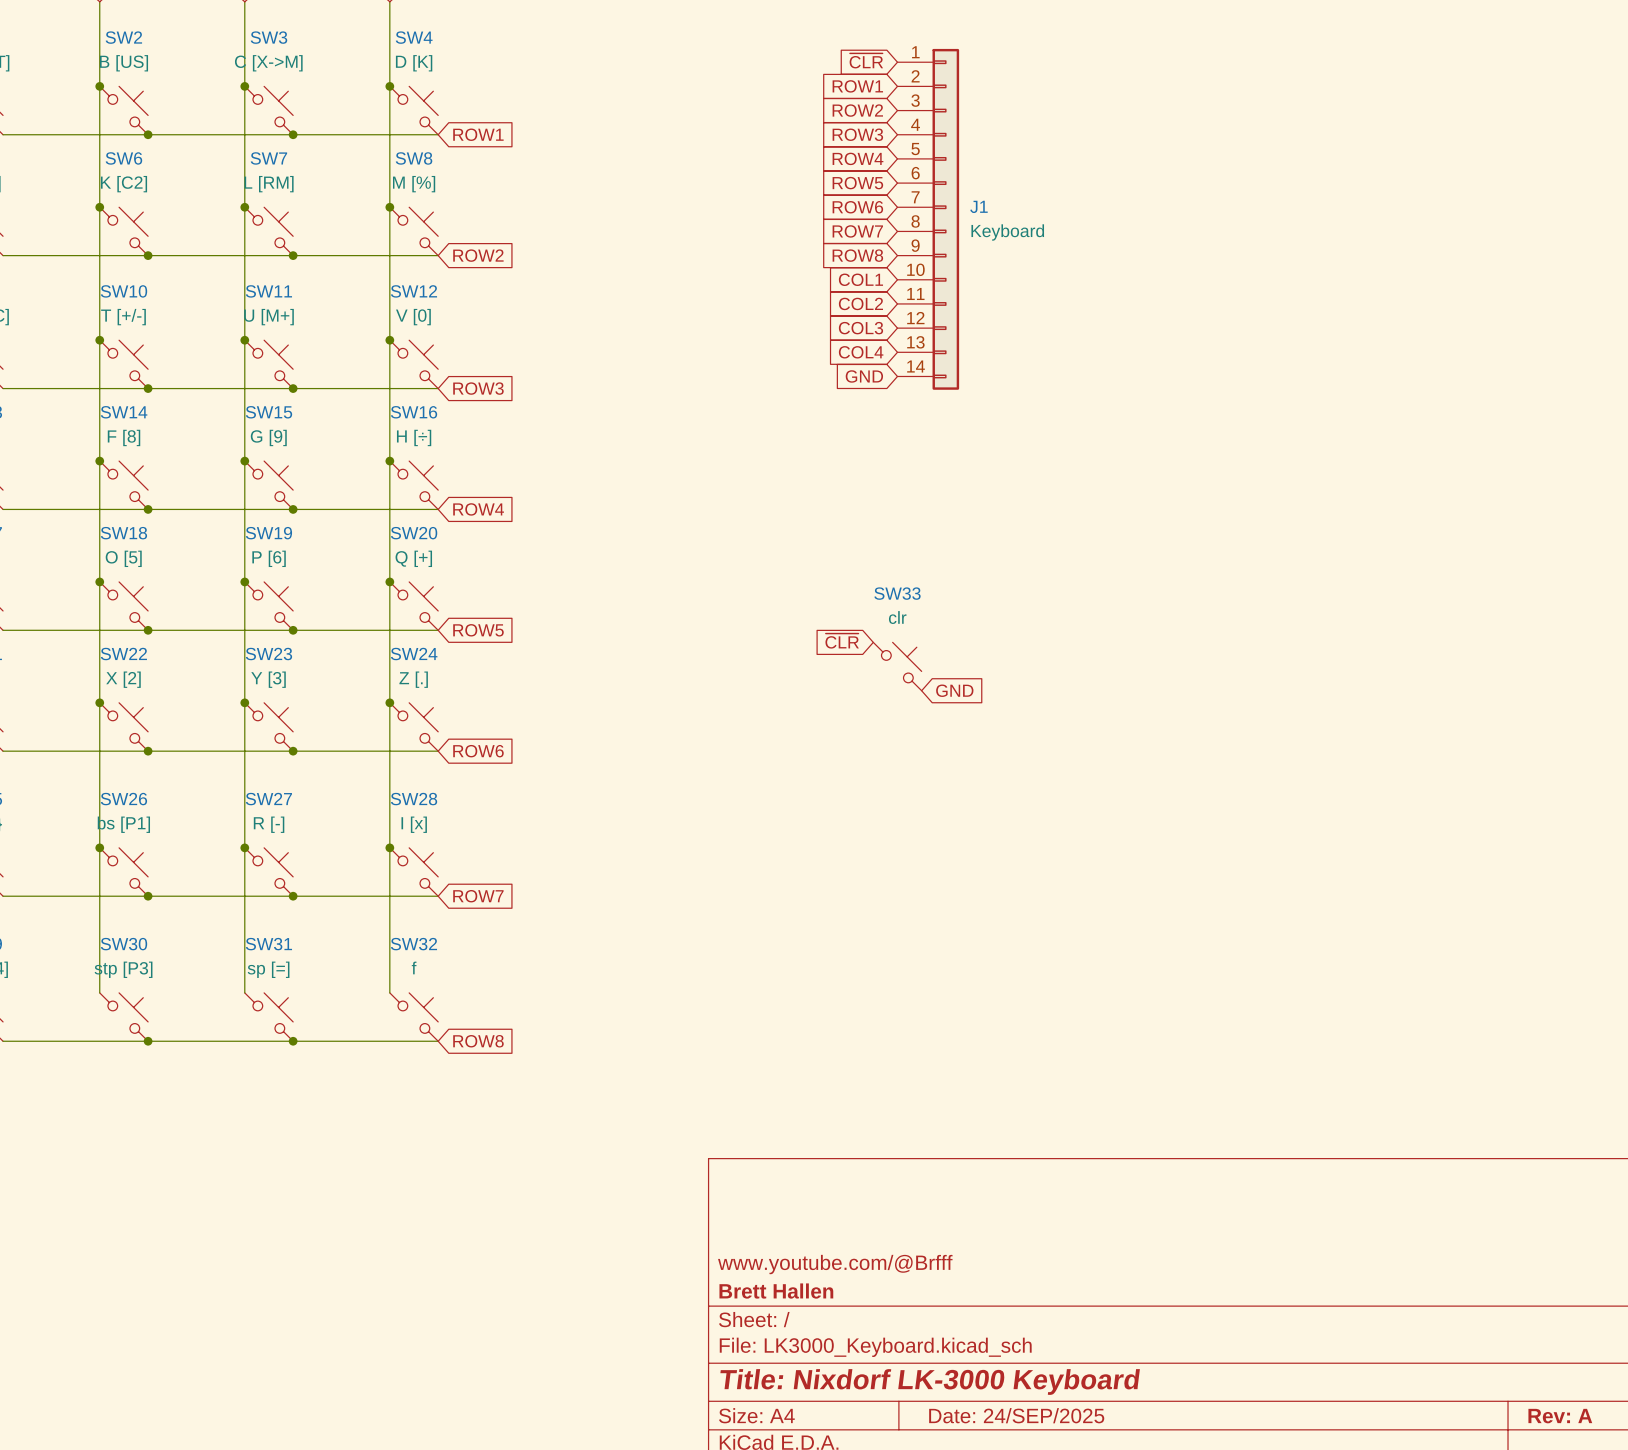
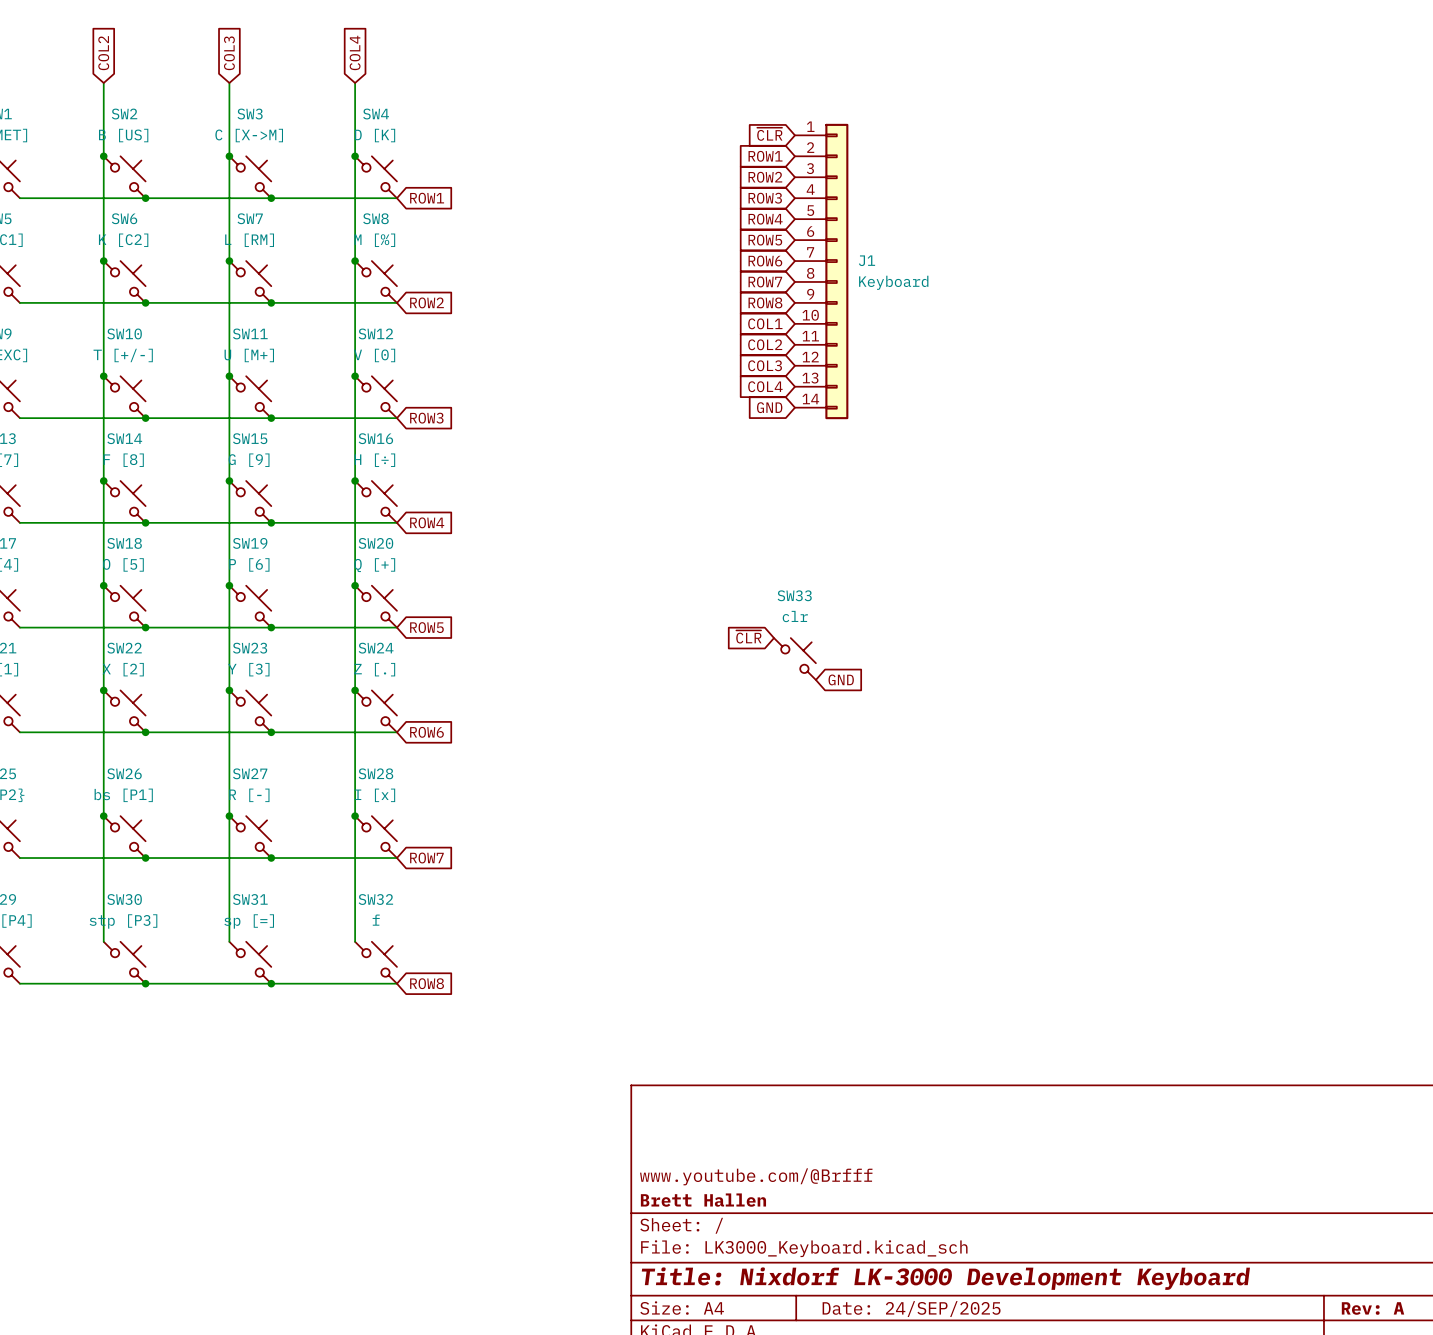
title block: Title: Nixdorf LK-3000 Keyboard (930, 1382) -> Title: Nixdorf LK-3000 Development Keyboard (945, 1278)

